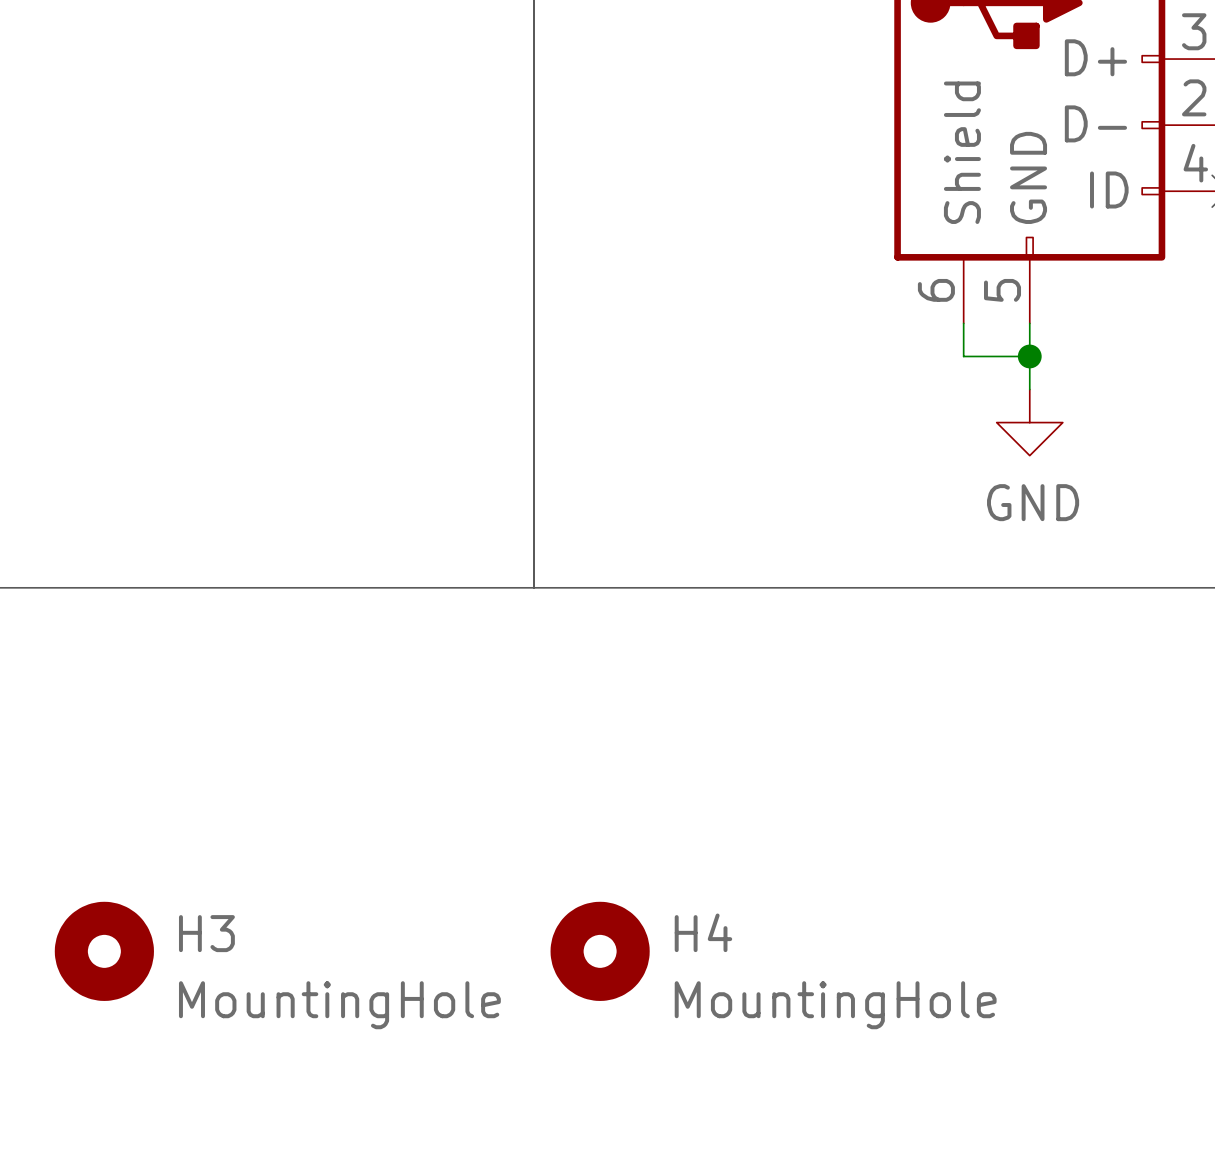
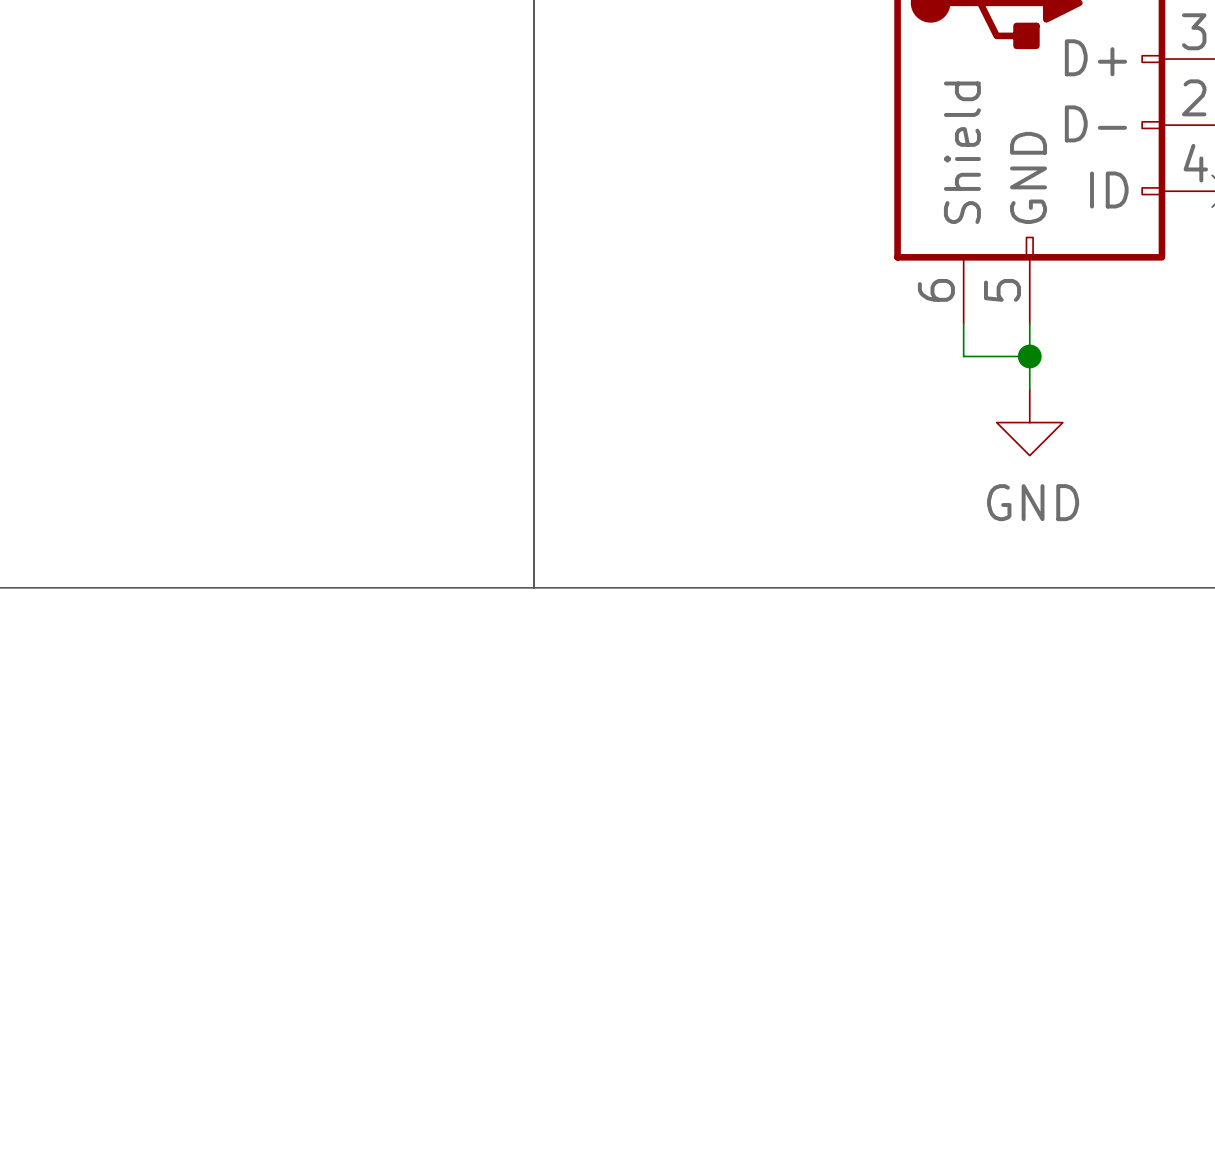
H3: MountingHole (104, 951) -> none
H4: MountingHole (600, 951) -> none

